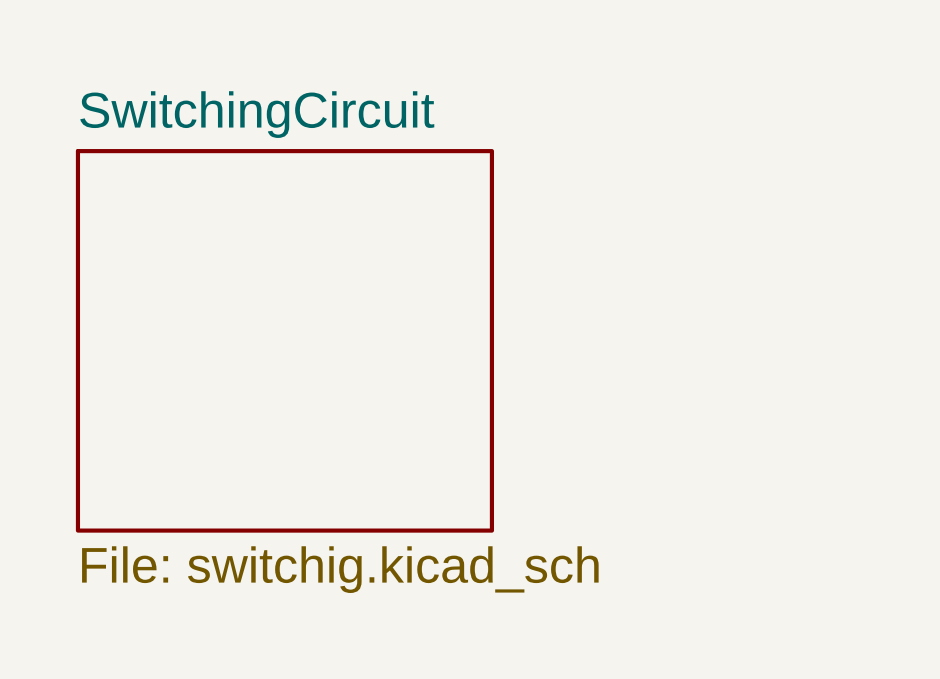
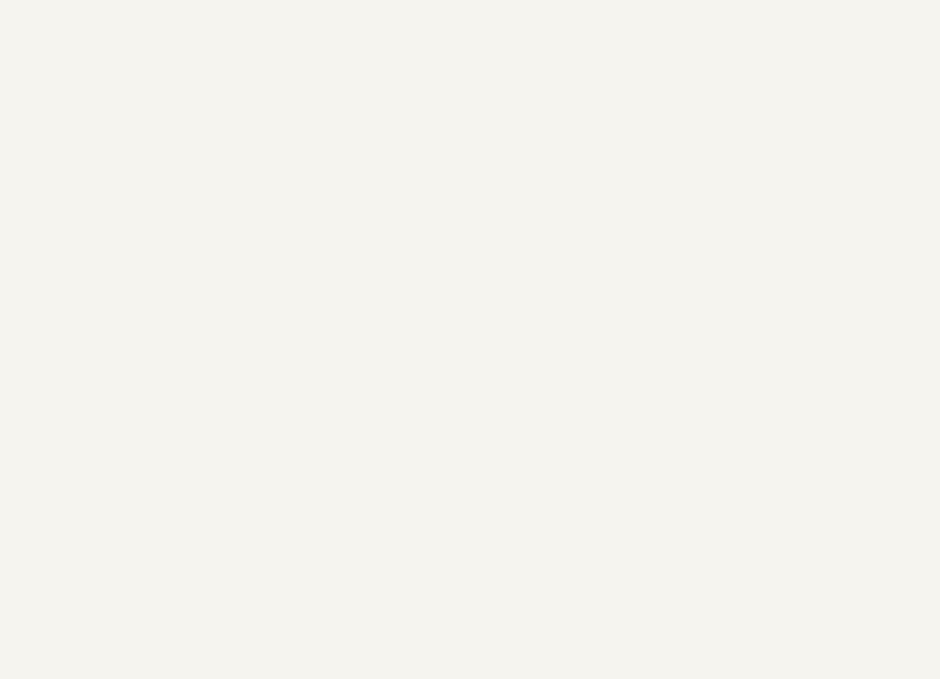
sheet SwitchingCircuit: File: switchig.kicad_sch (284, 340) -> none

